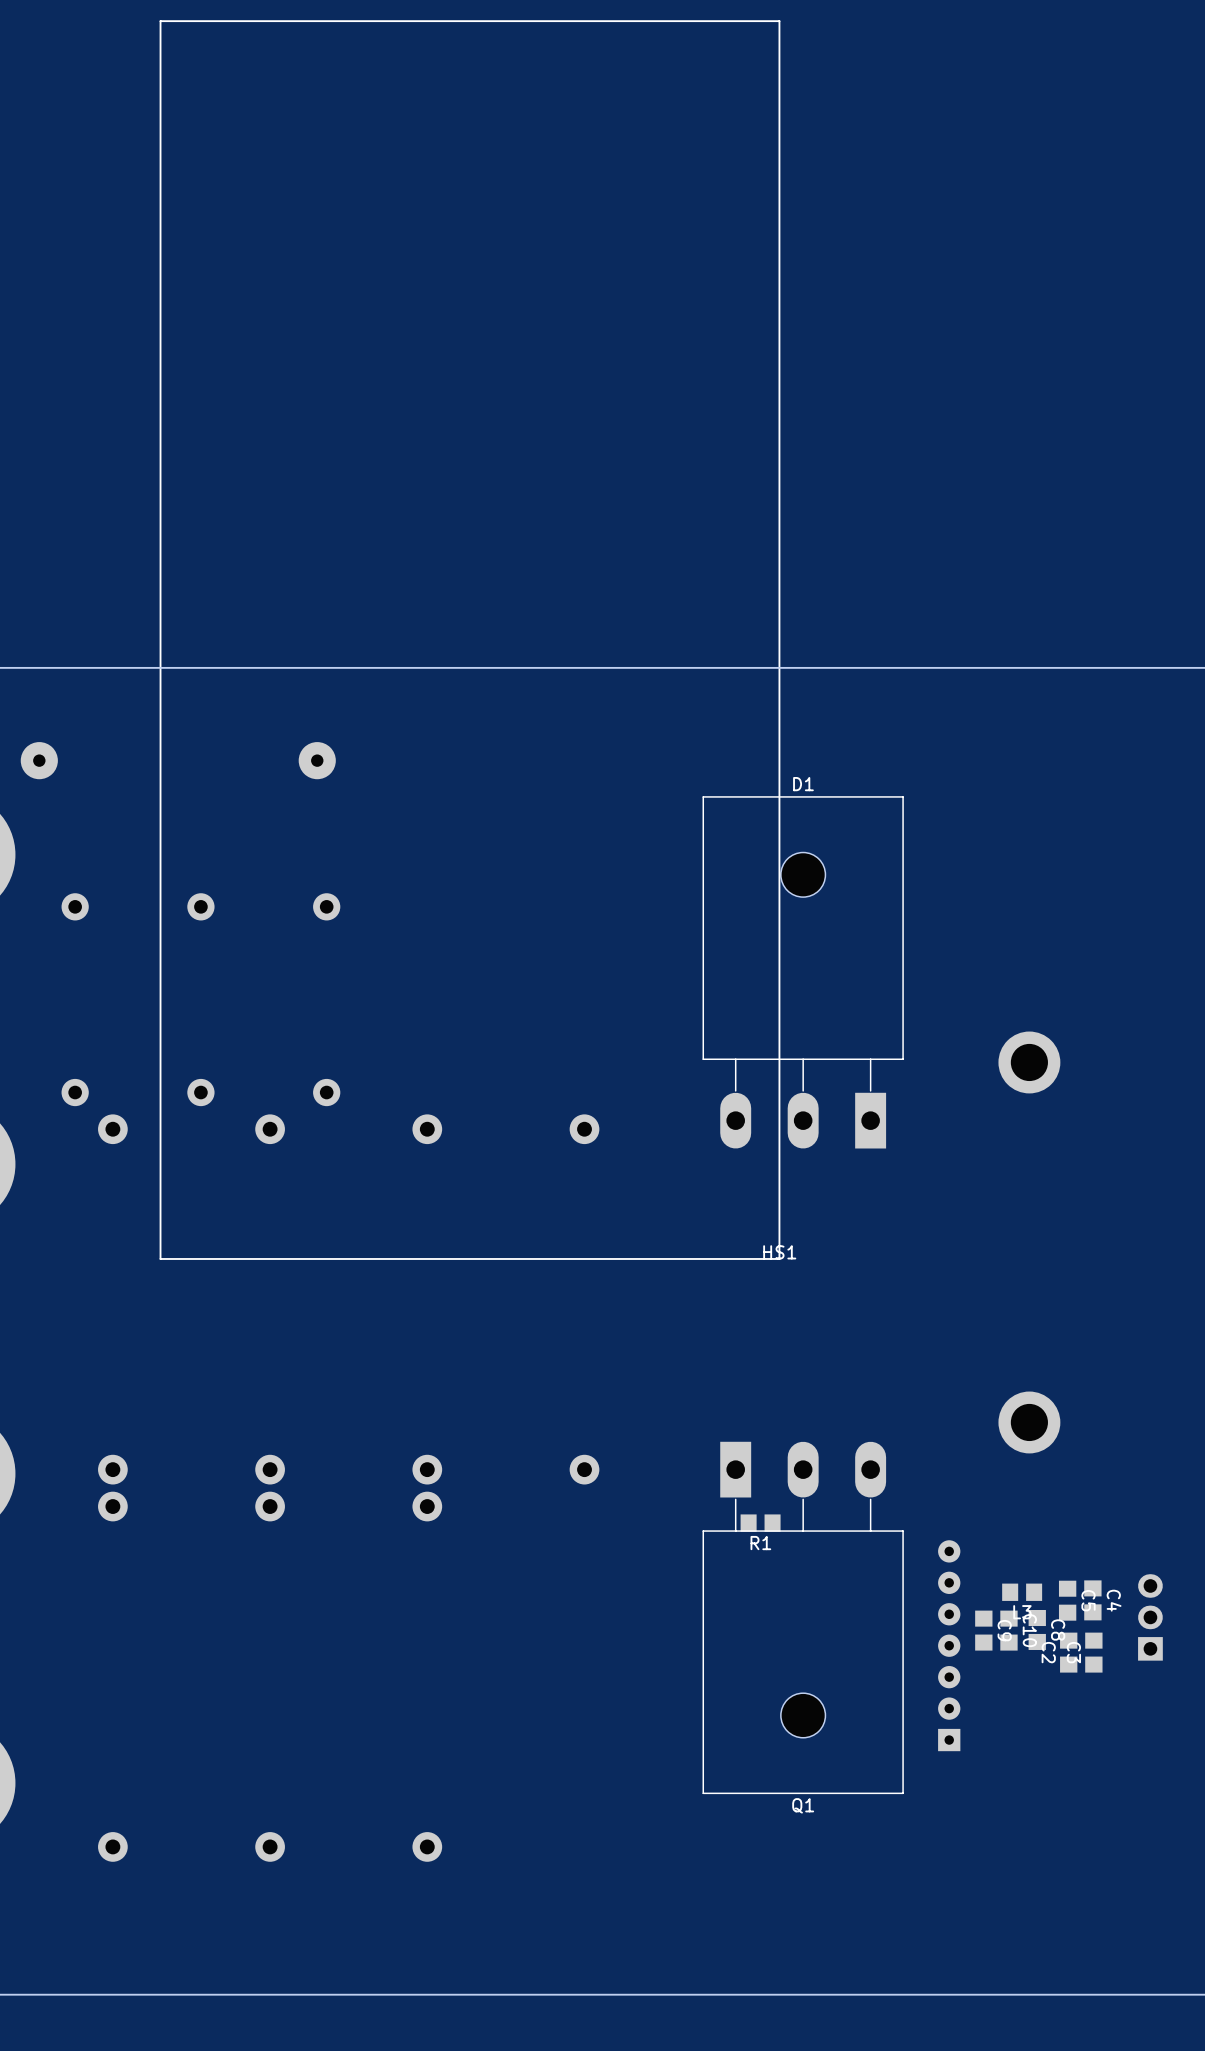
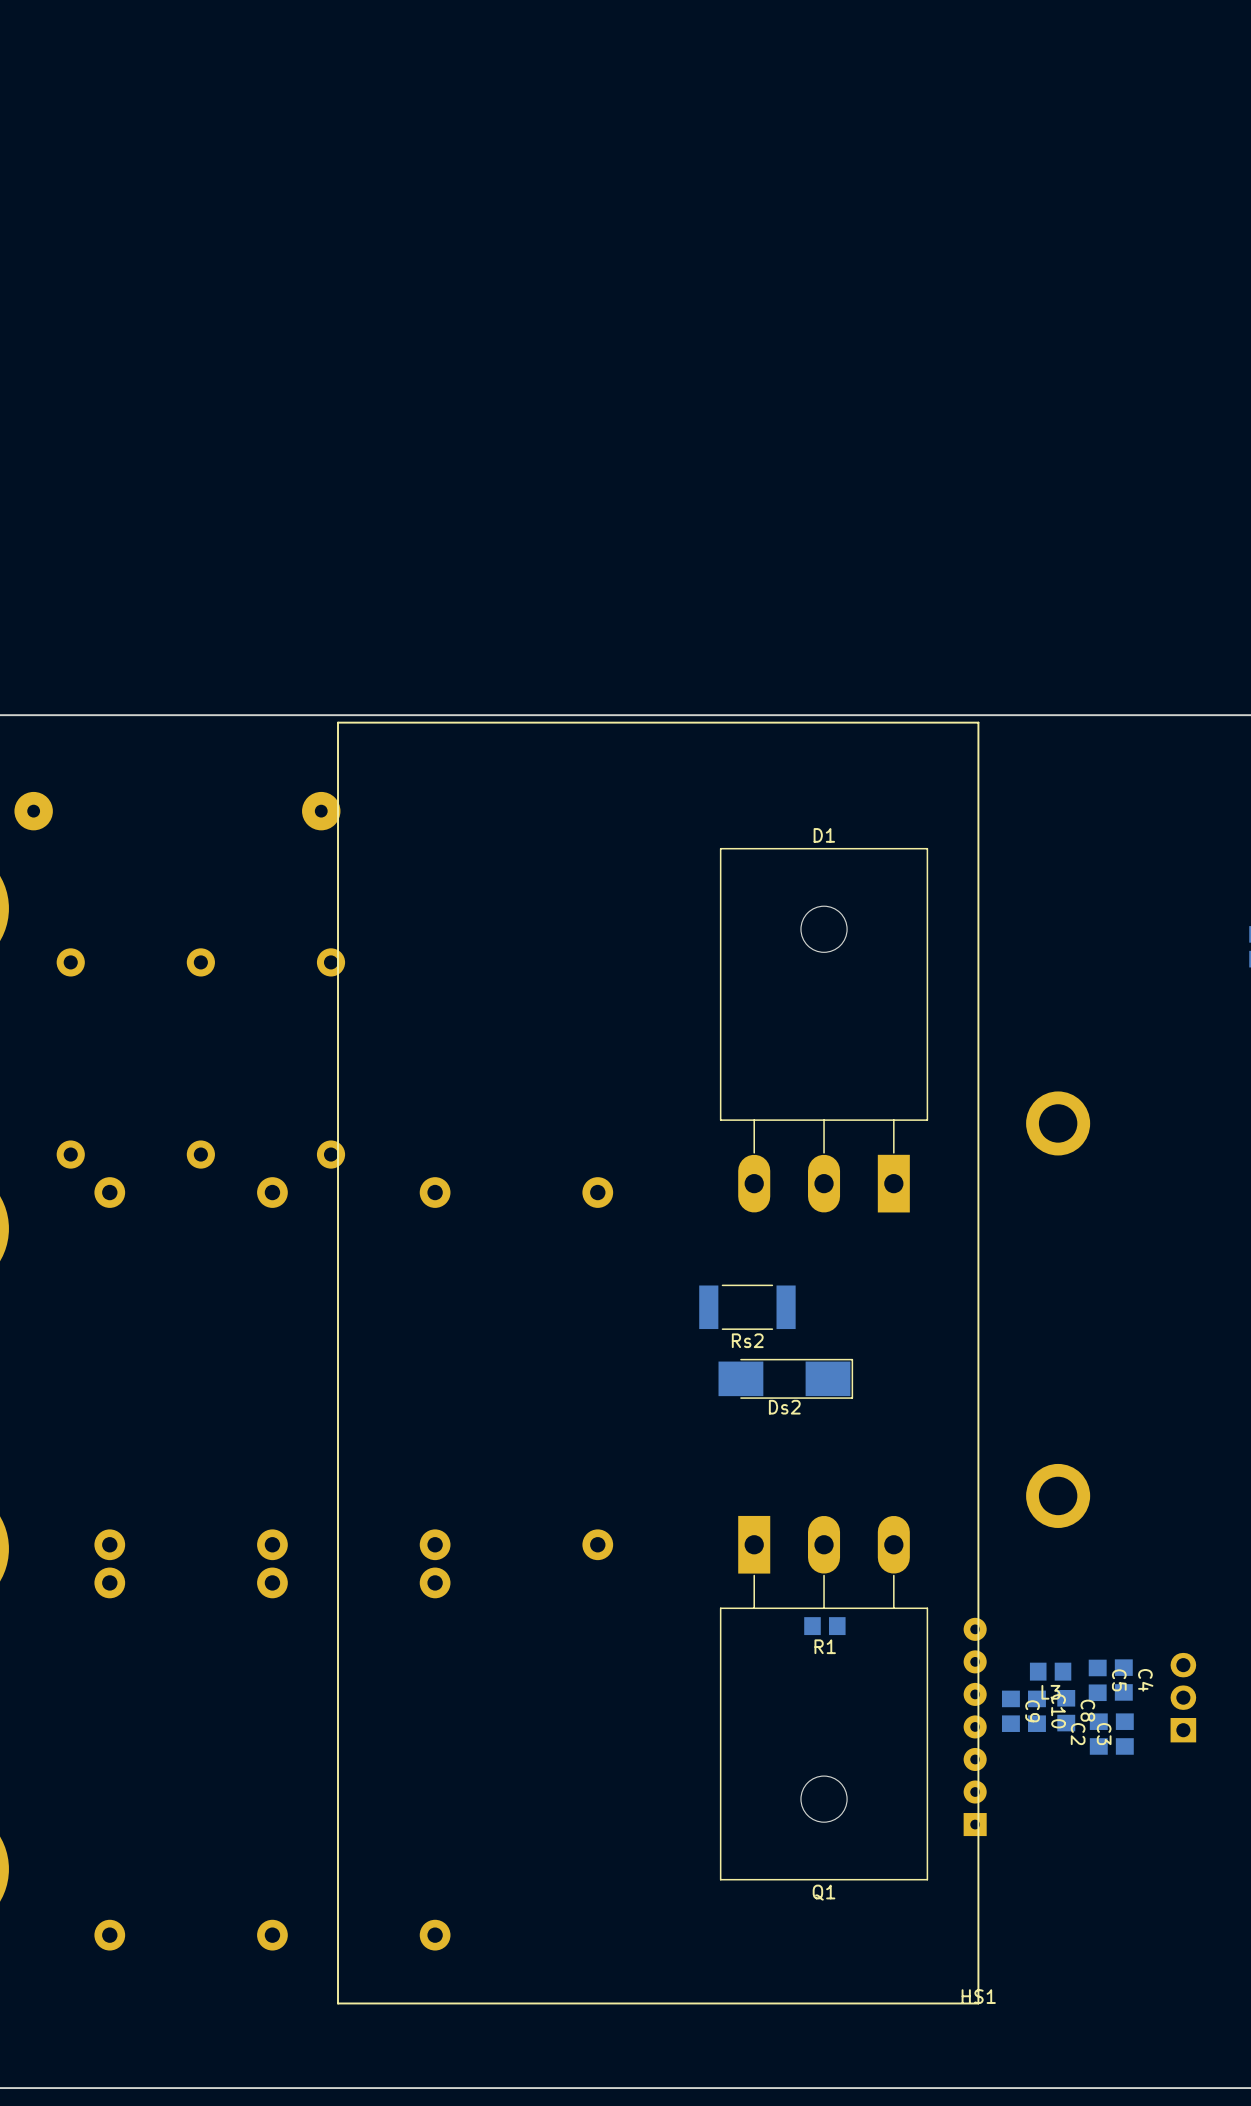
HS1 position: (469, 640) -> (658, 1363)
Rs2: none -> (747, 1307)
Ds2: none -> (785, 1378)
R1 position: (760, 1523) -> (824, 1626)

